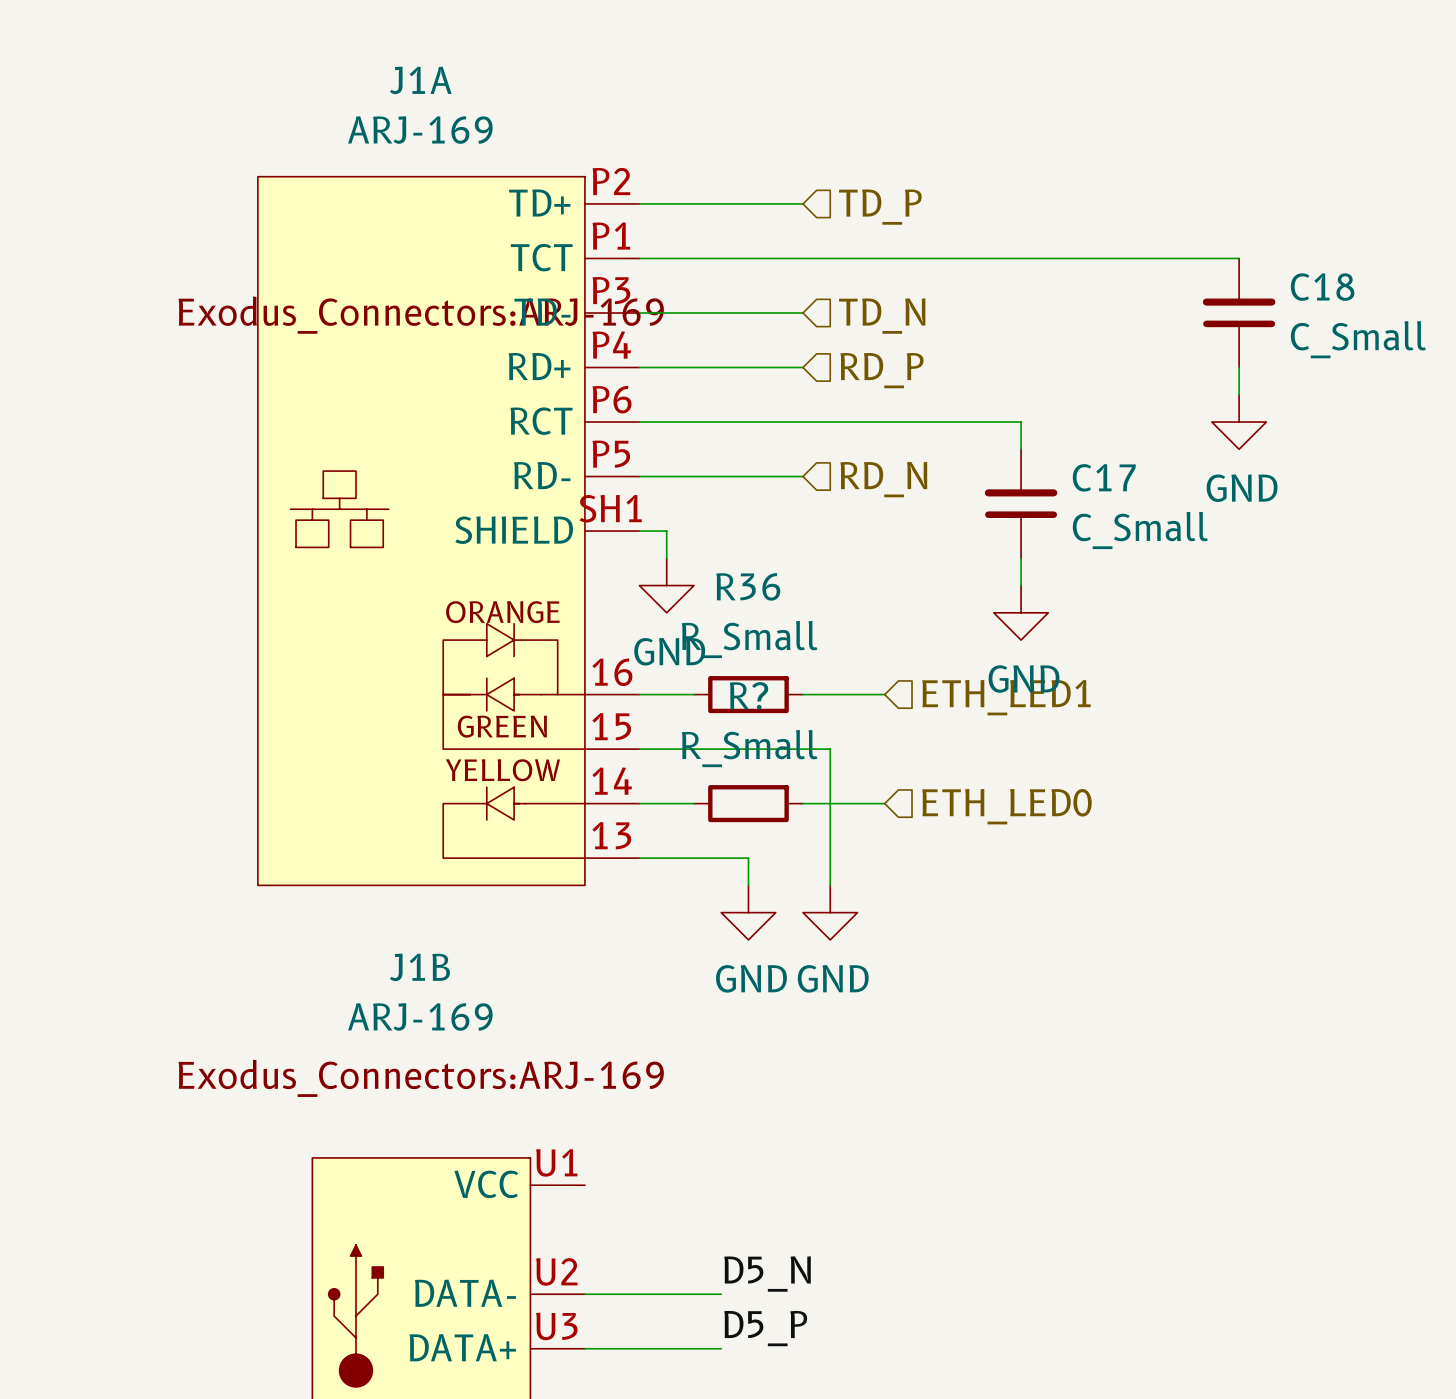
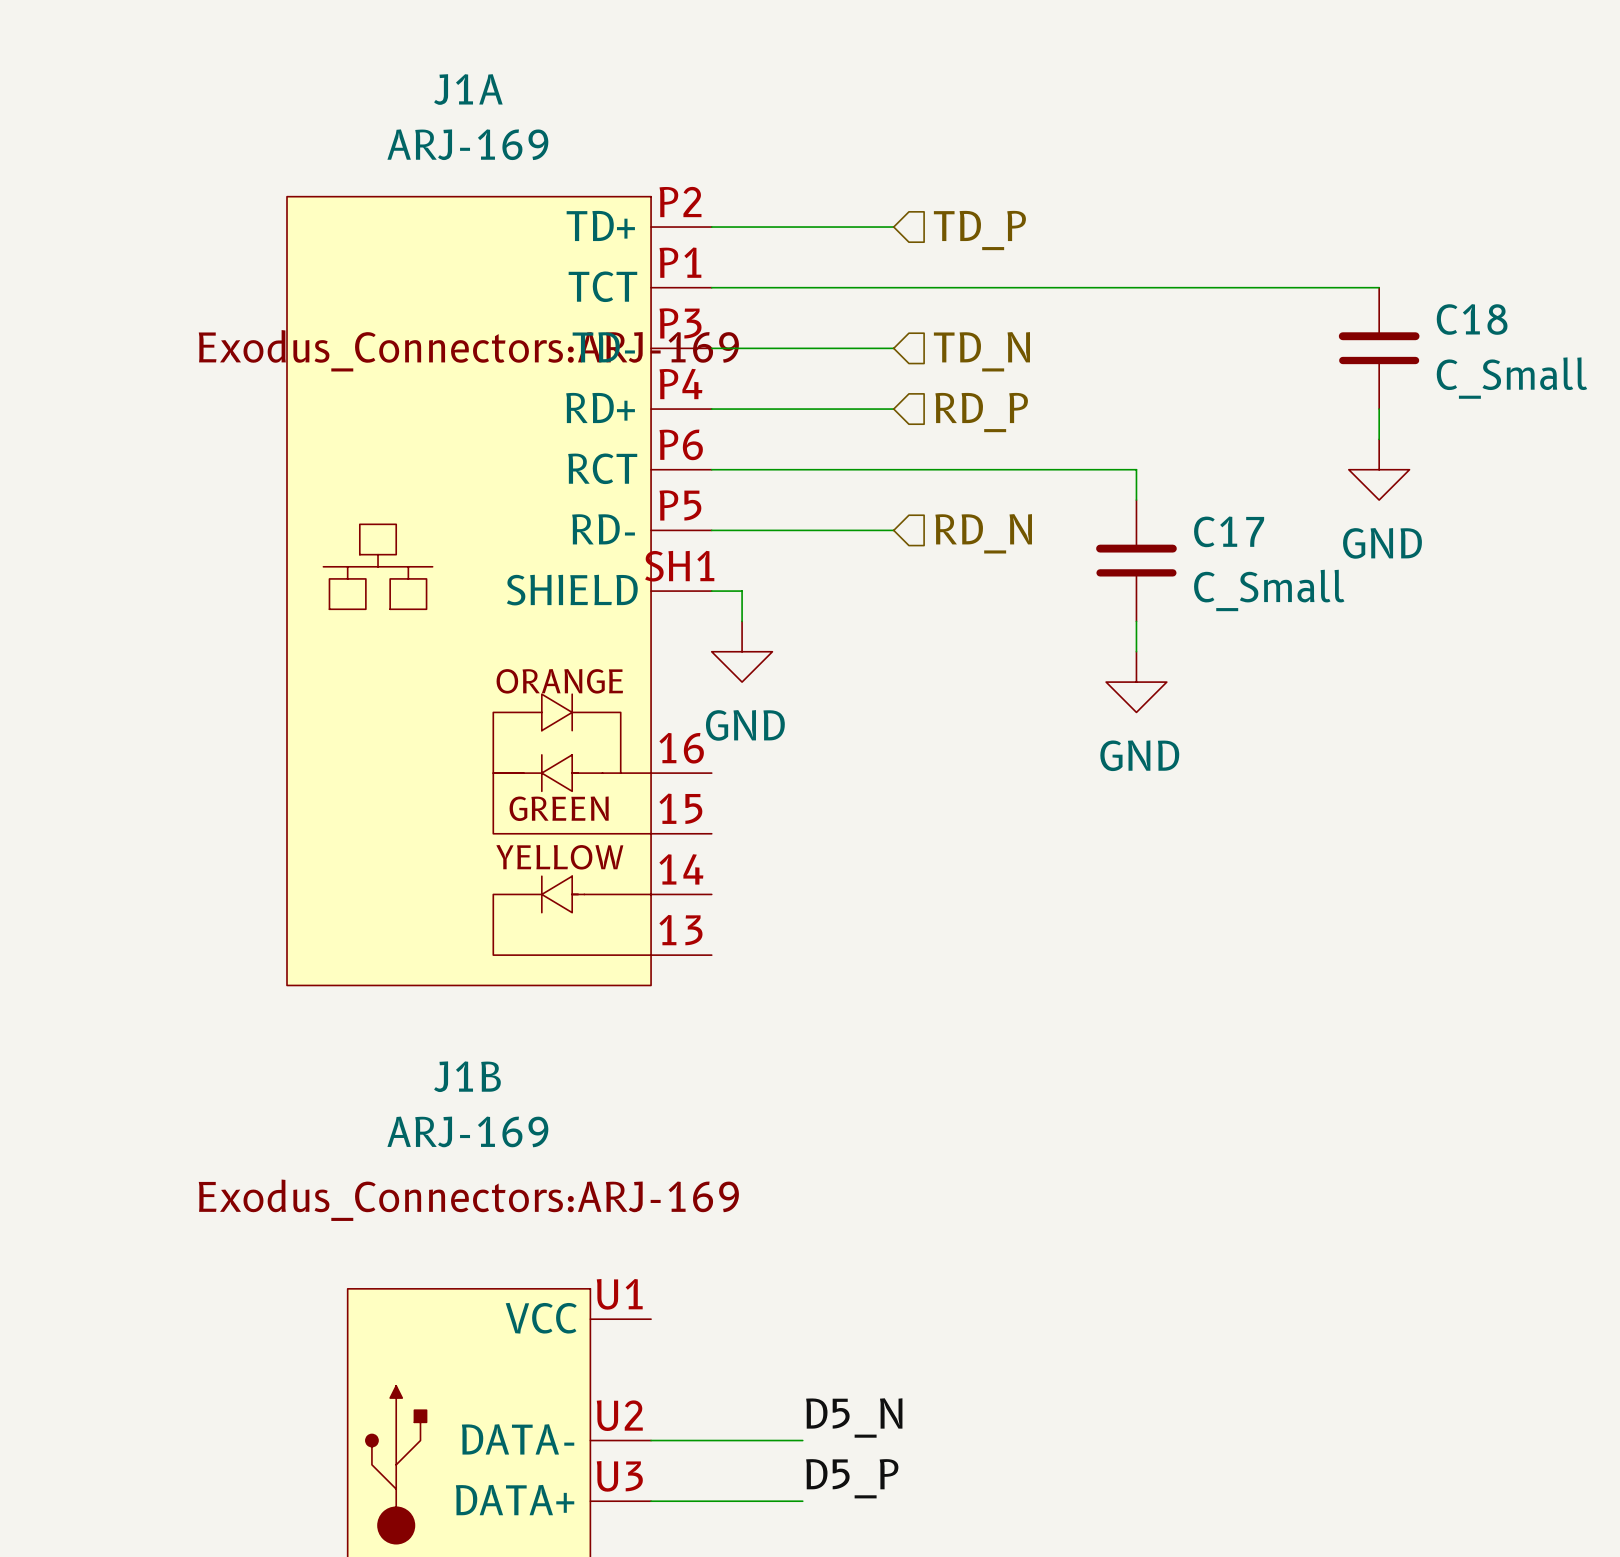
wire: (639, 694) (693, 694) -> none
R36: R_Small (748, 694) -> none
wire: (802, 694) (884, 694) -> none
hierarchical label: ETH_LED1 (1006, 697) -> none
wire: (639, 749) (830, 749) (830, 885) -> none
wire: (639, 803) (693, 803) -> none
R?: R_Small (748, 803) -> none
wire: (802, 803) (884, 803) -> none
hierarchical label: ETH_LED0 (1006, 806) -> none
wire: (639, 858) (748, 858) (748, 885) -> none
power symbol: GND (748, 912) -> none
power symbol: GND (830, 912) -> none

